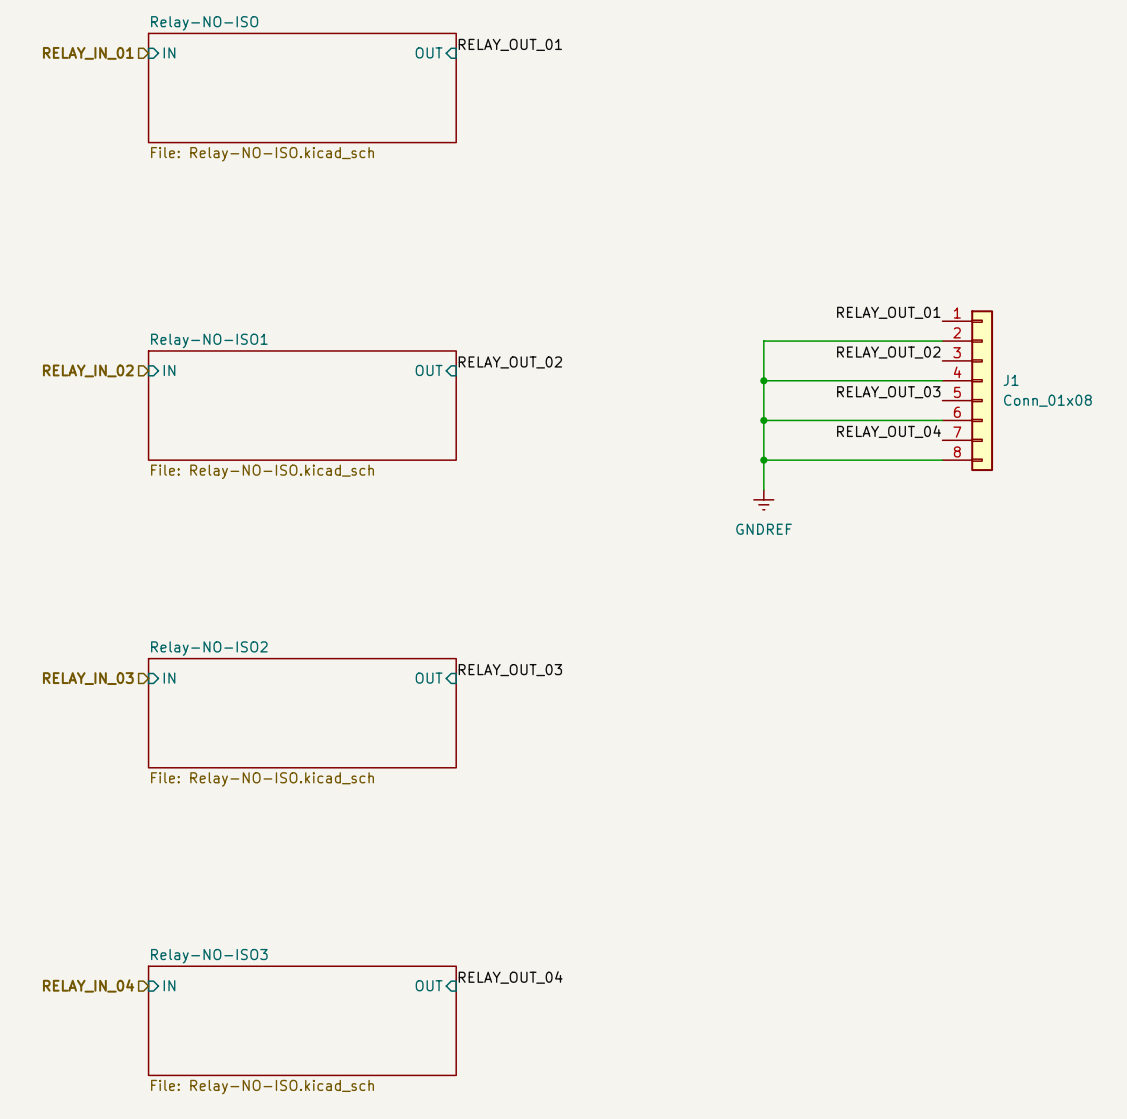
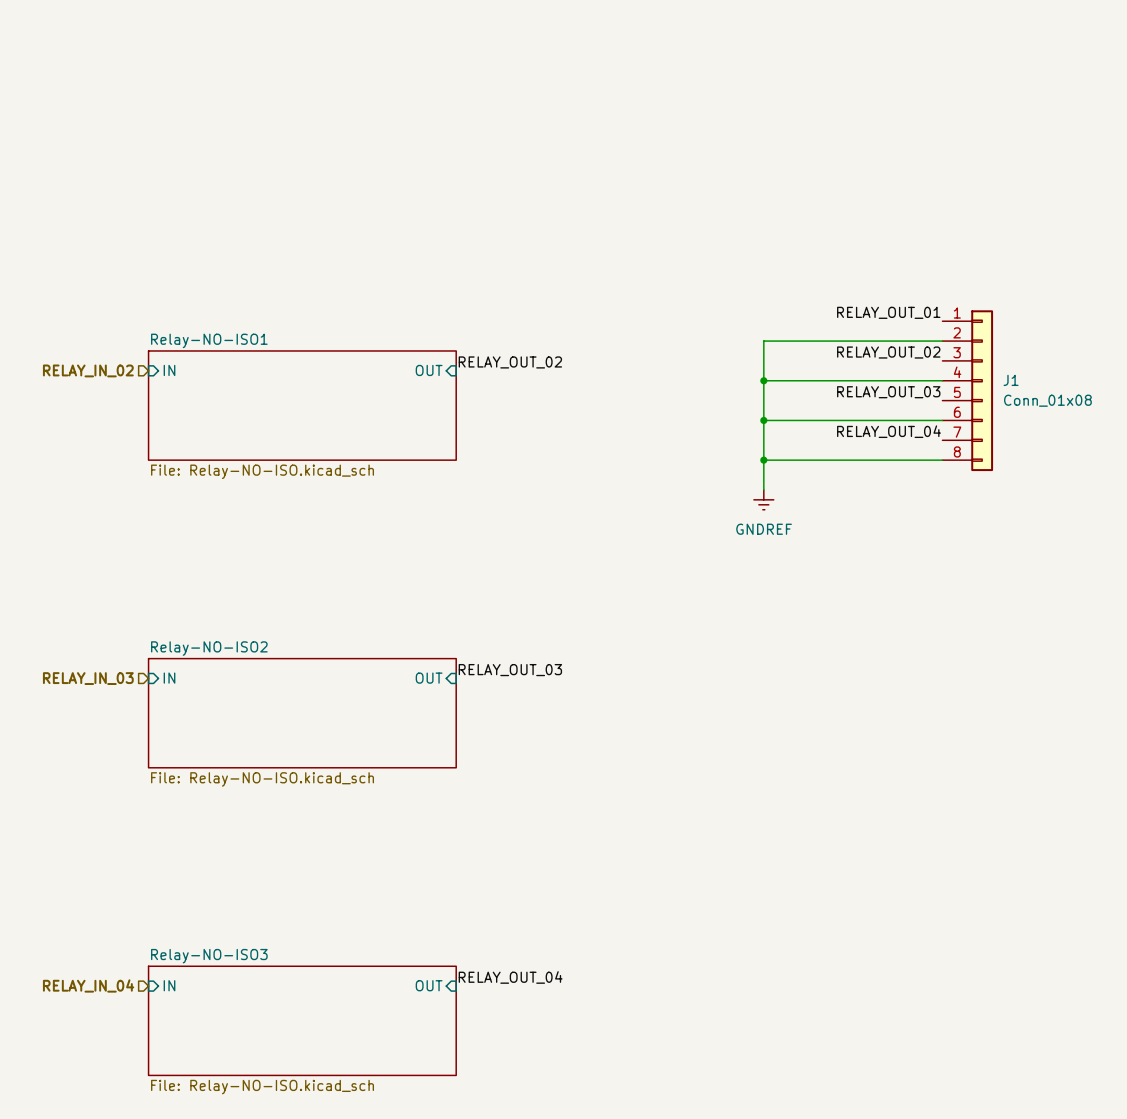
label: RELAY_OUT_01 (510, 44) -> none
sheet pin: IN (169, 52) -> none
sheet pin: OUT (429, 52) -> none
hierarchical label: RELAY_IN_01 (88, 53) -> none
sheet Relay-NO-ISO: File: Relay-NO-ISO.kicad_sch (302, 88) -> none

